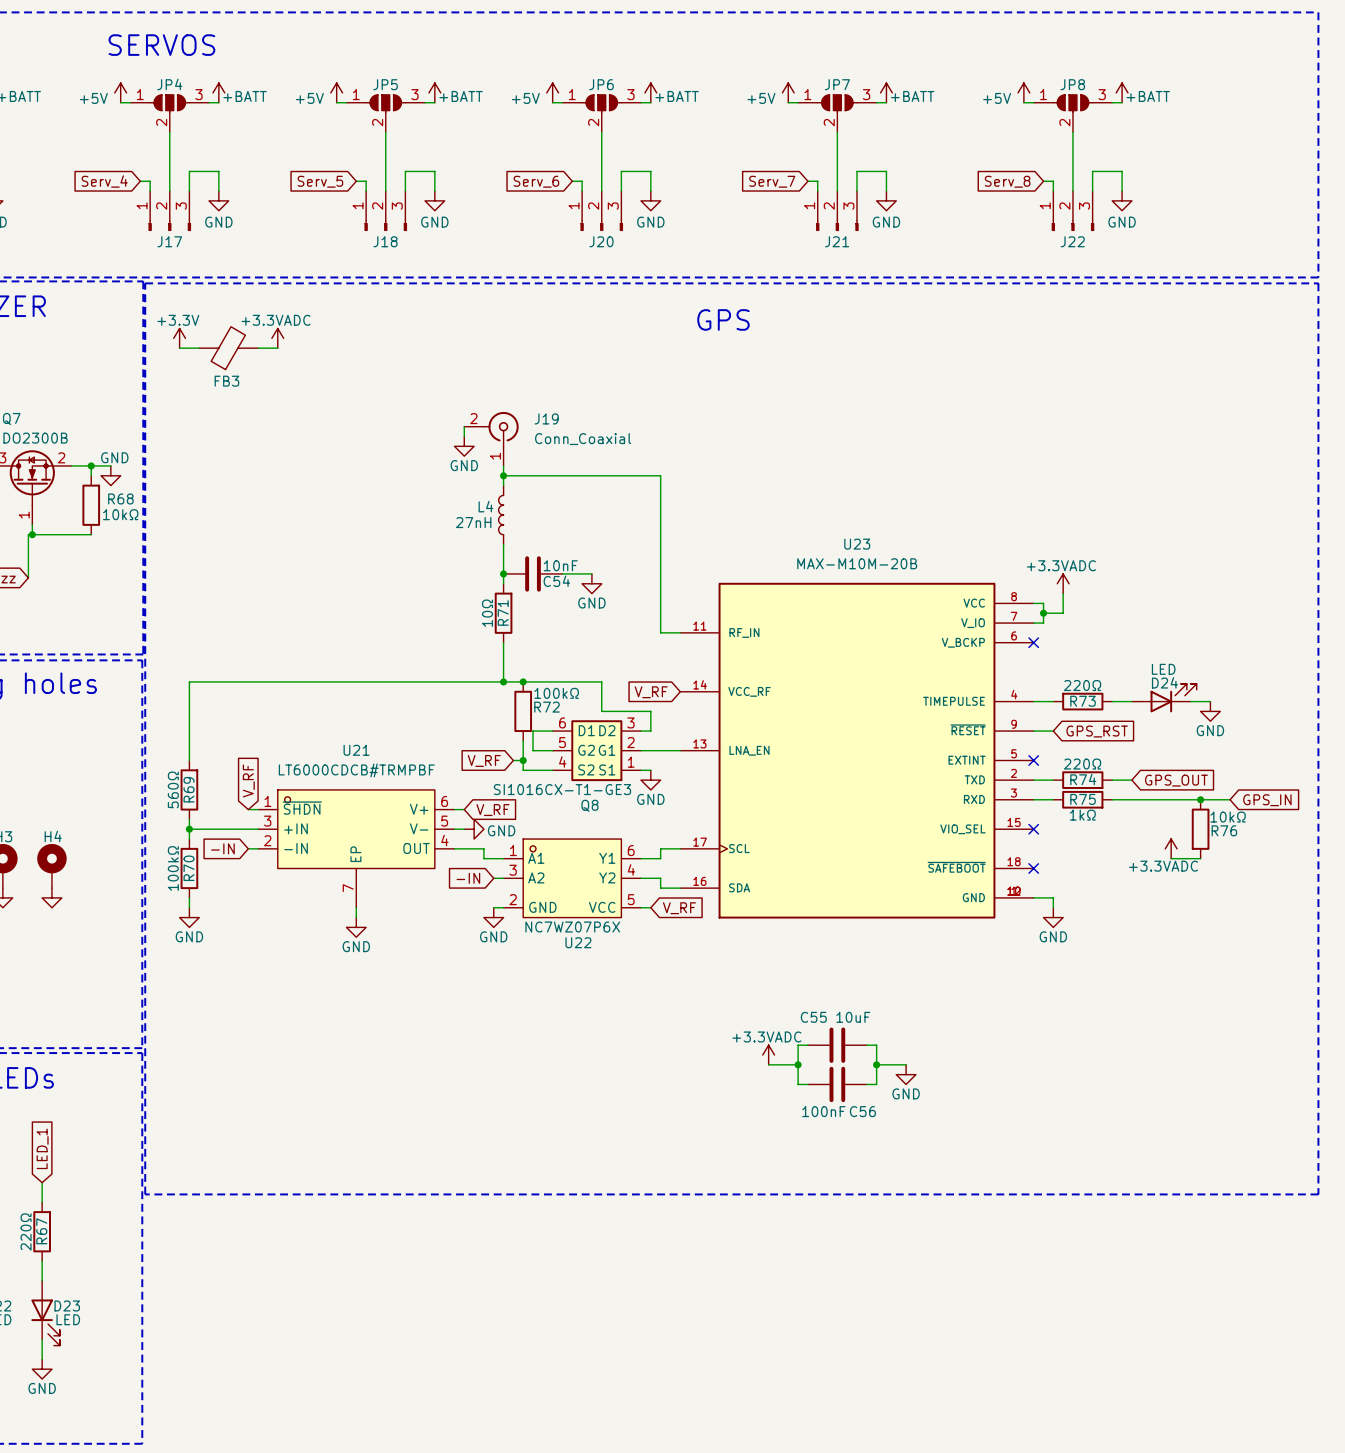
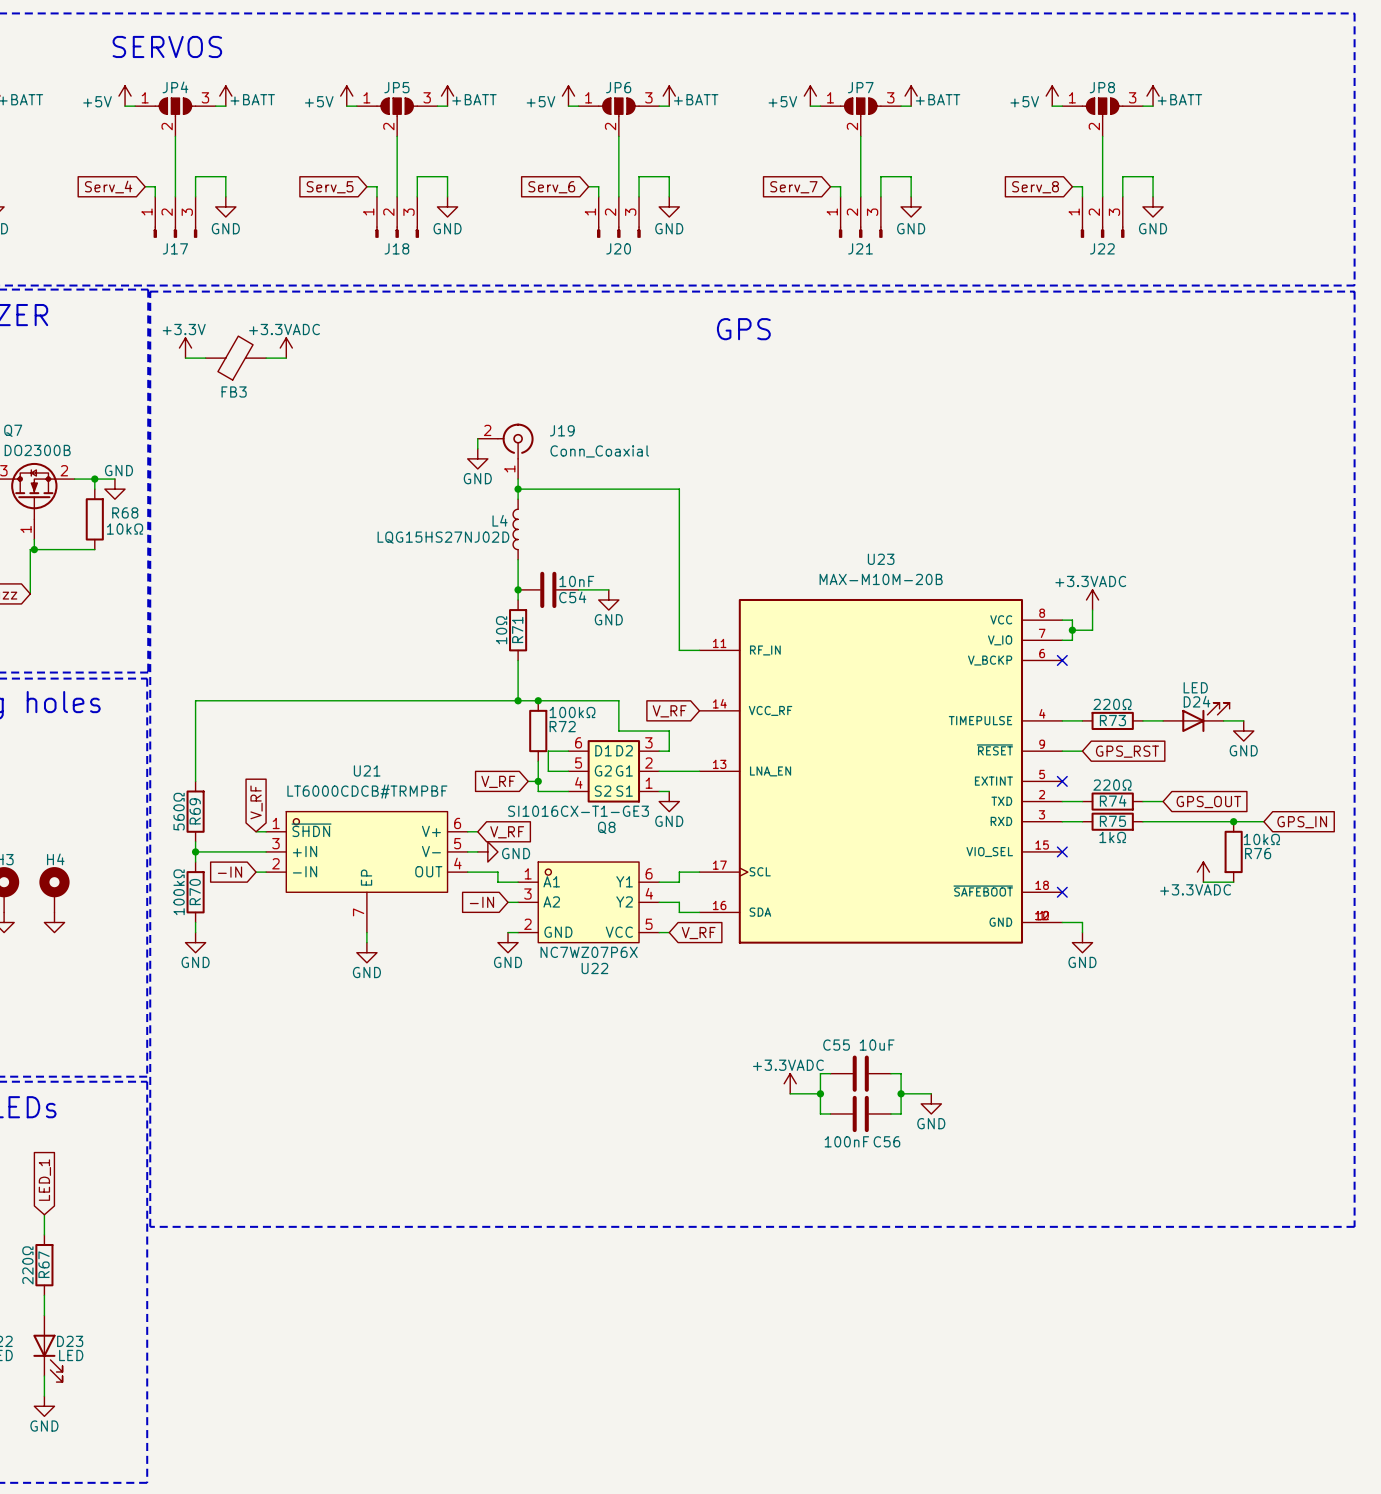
L4 value: 27nH (473, 522) -> LQG15HS27NJ02D (443, 537)

